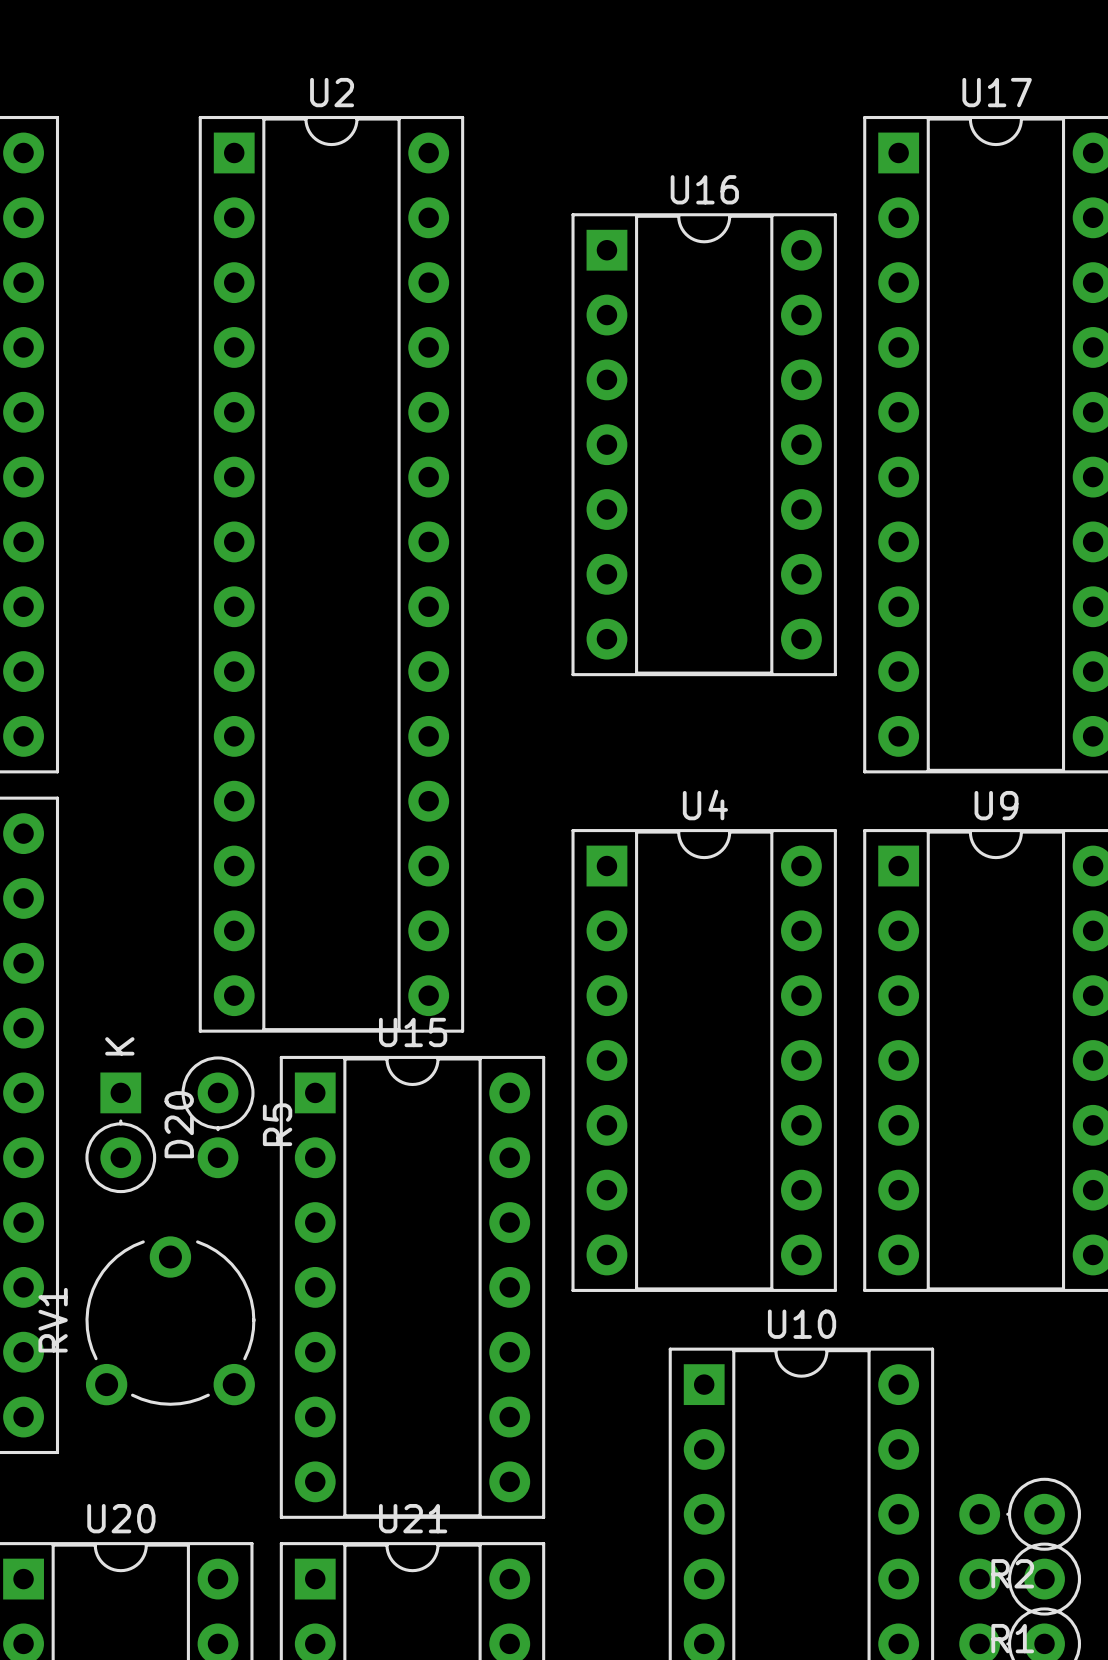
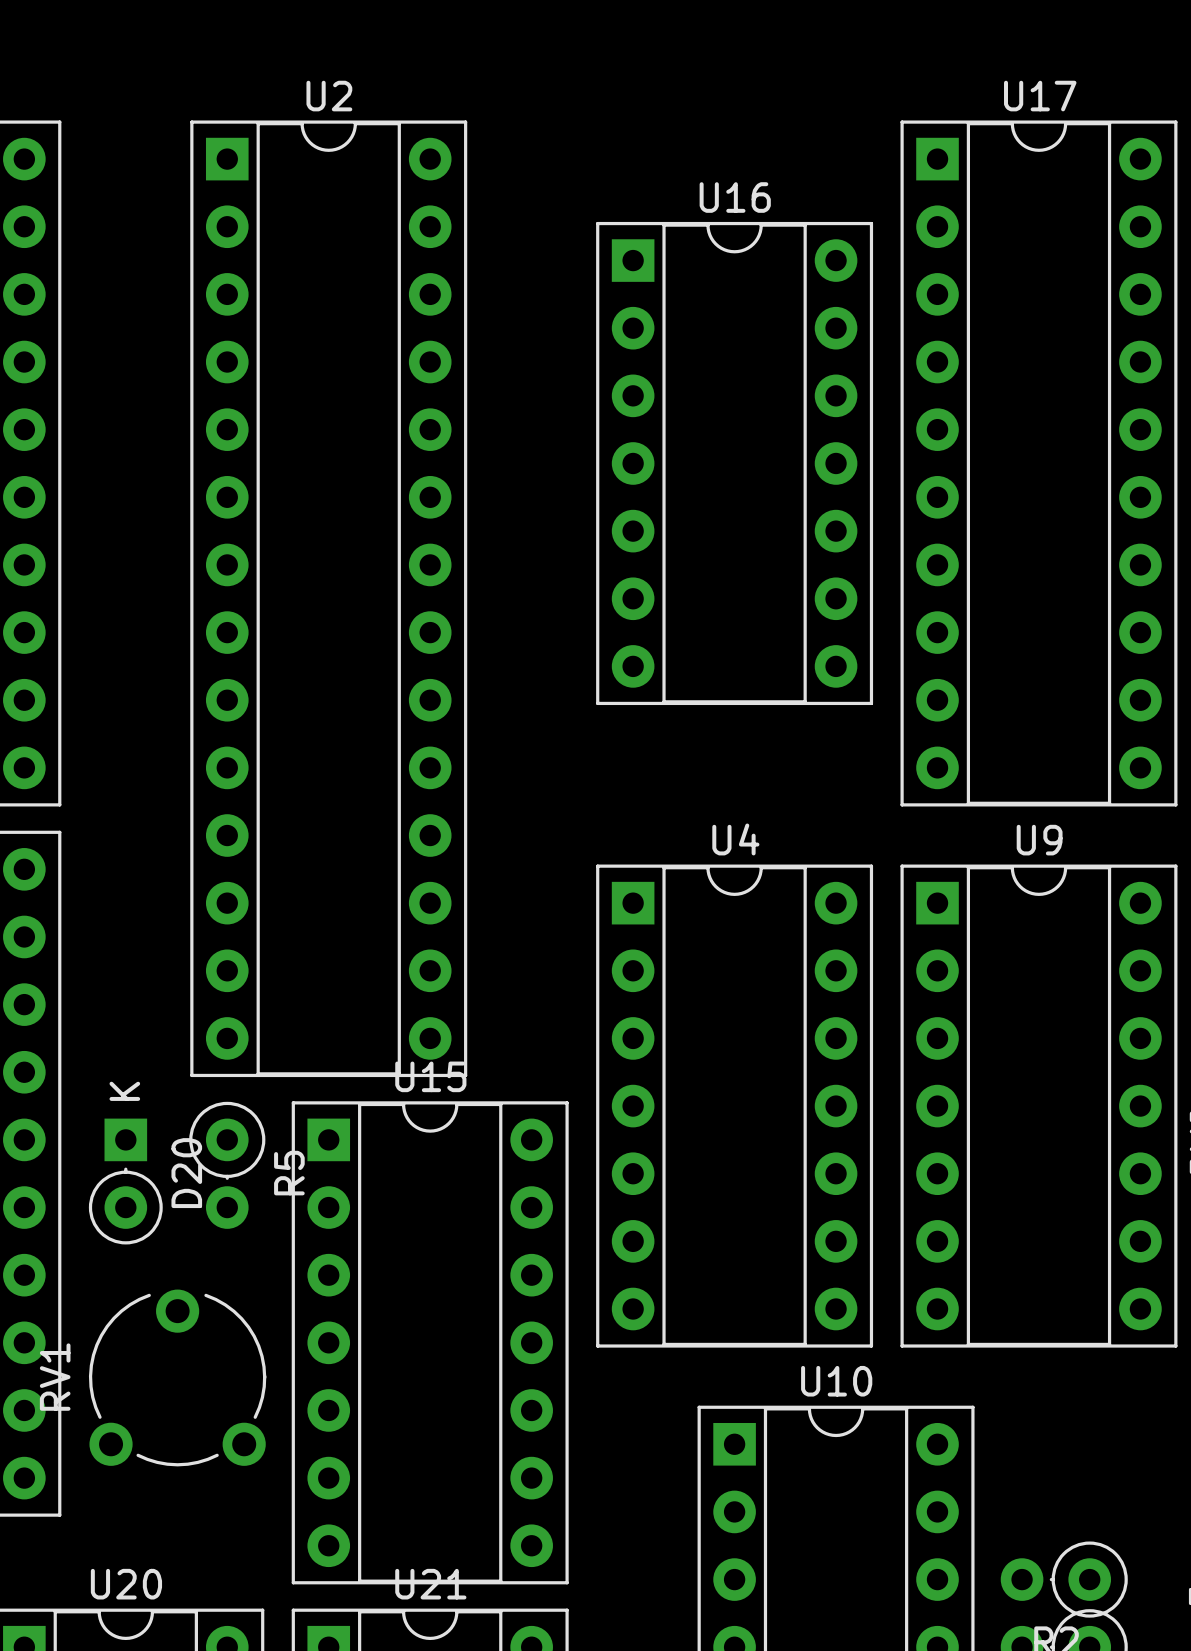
U2 position: (331, 574) -> (328, 598)

